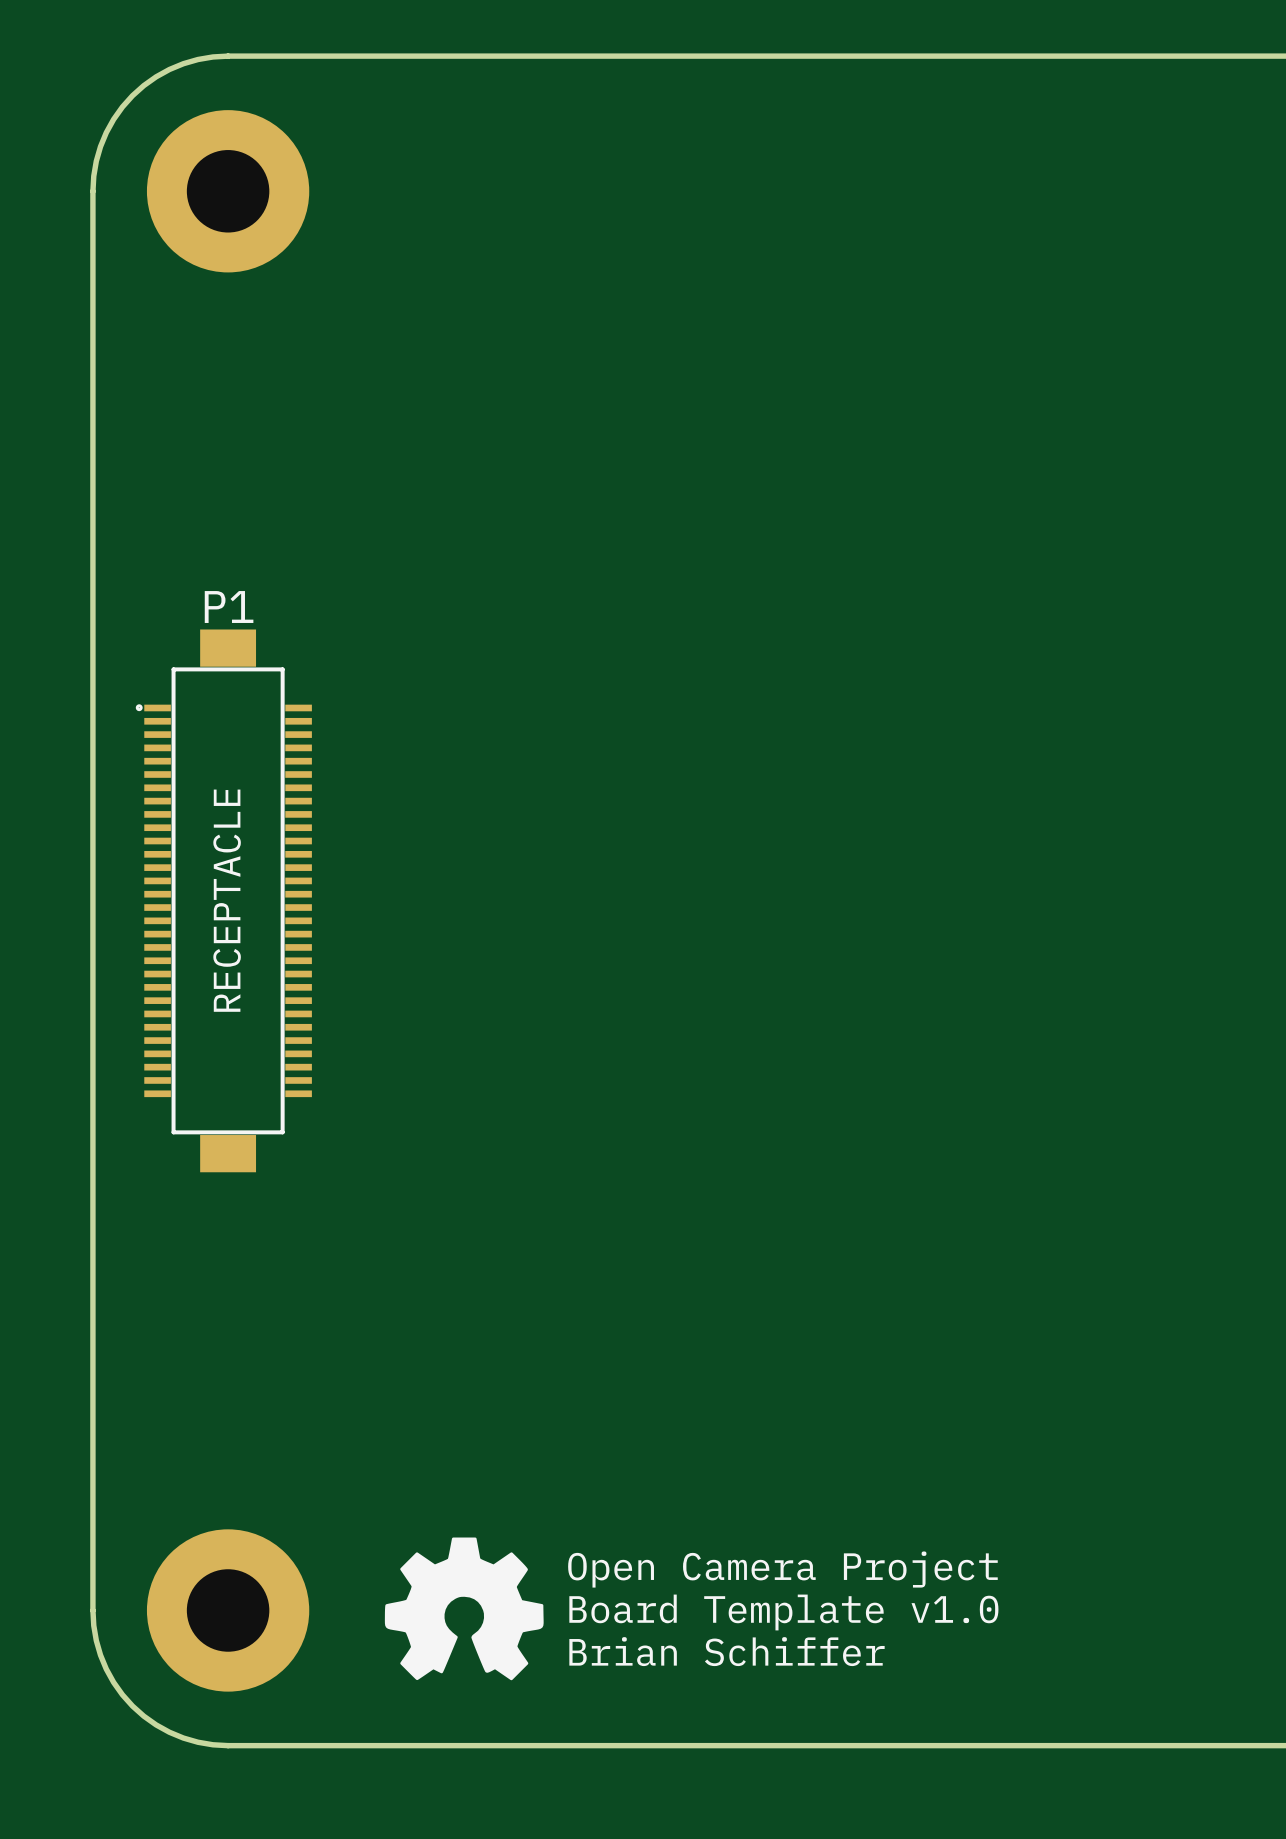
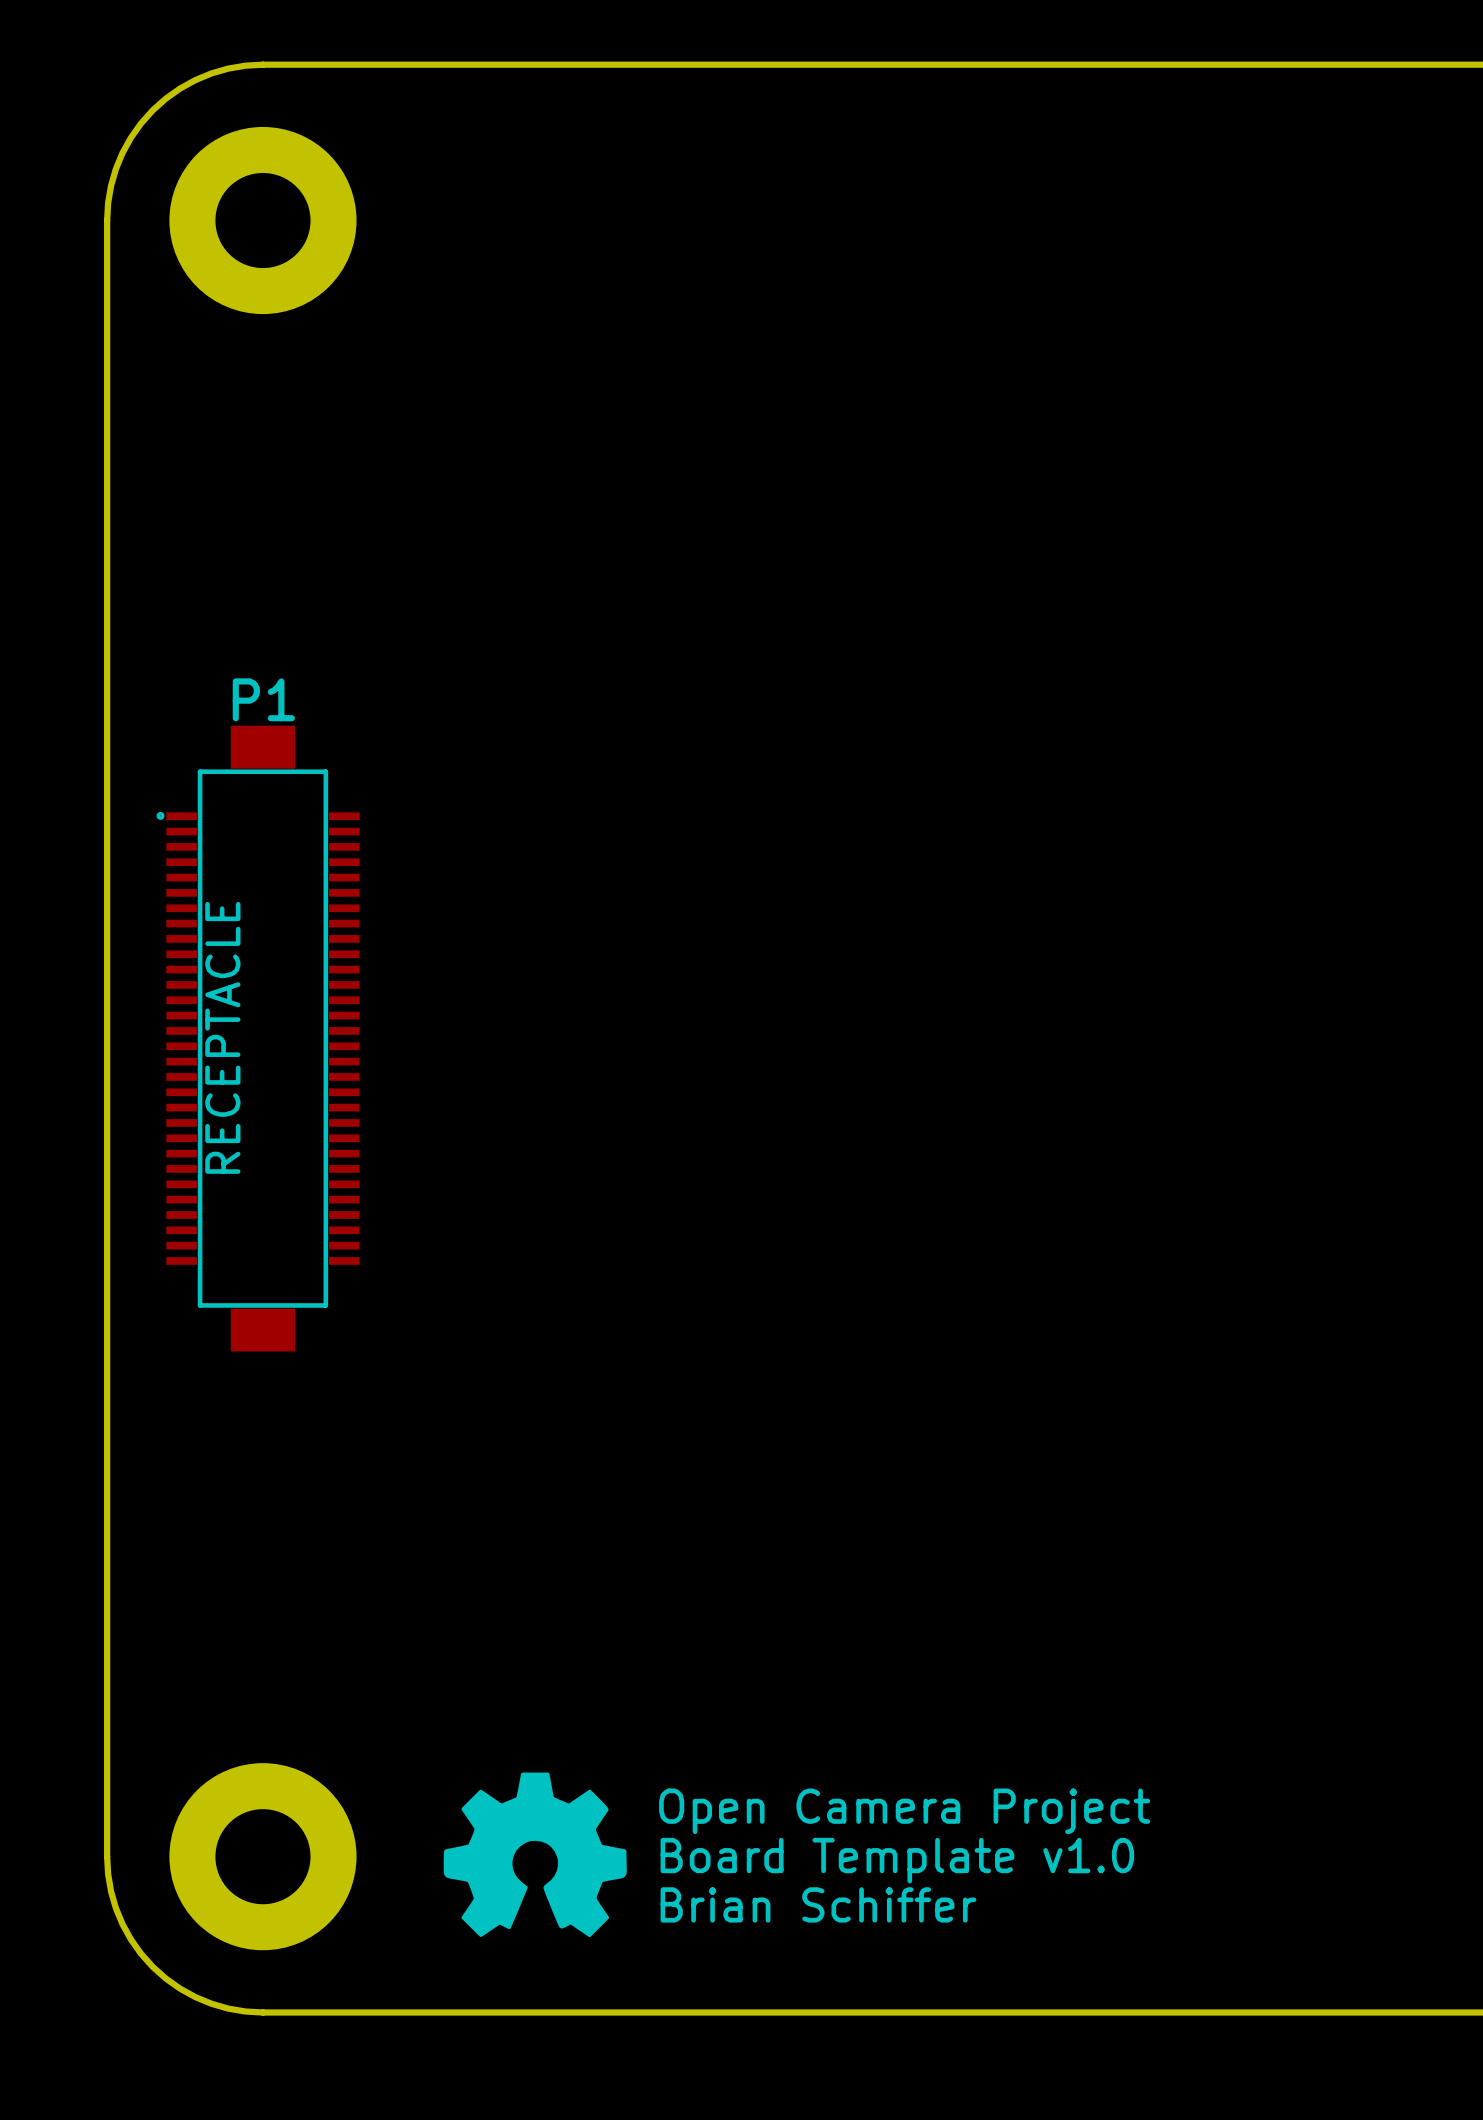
P1 text position: RECEPTACLE (227, 900) -> RECEPTACLE (222, 1037)

